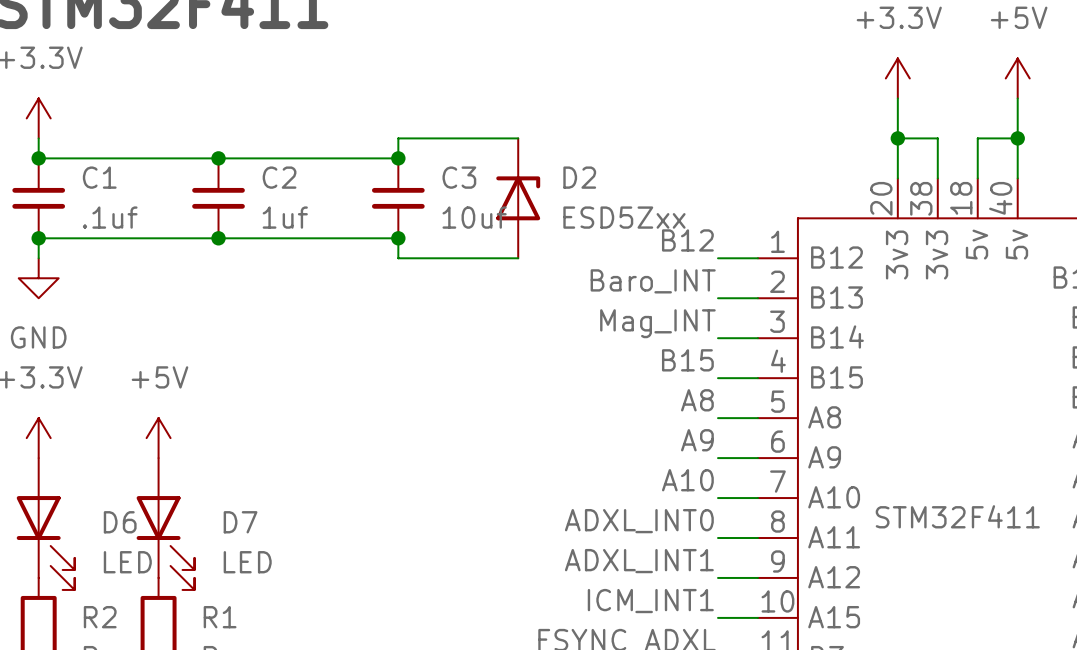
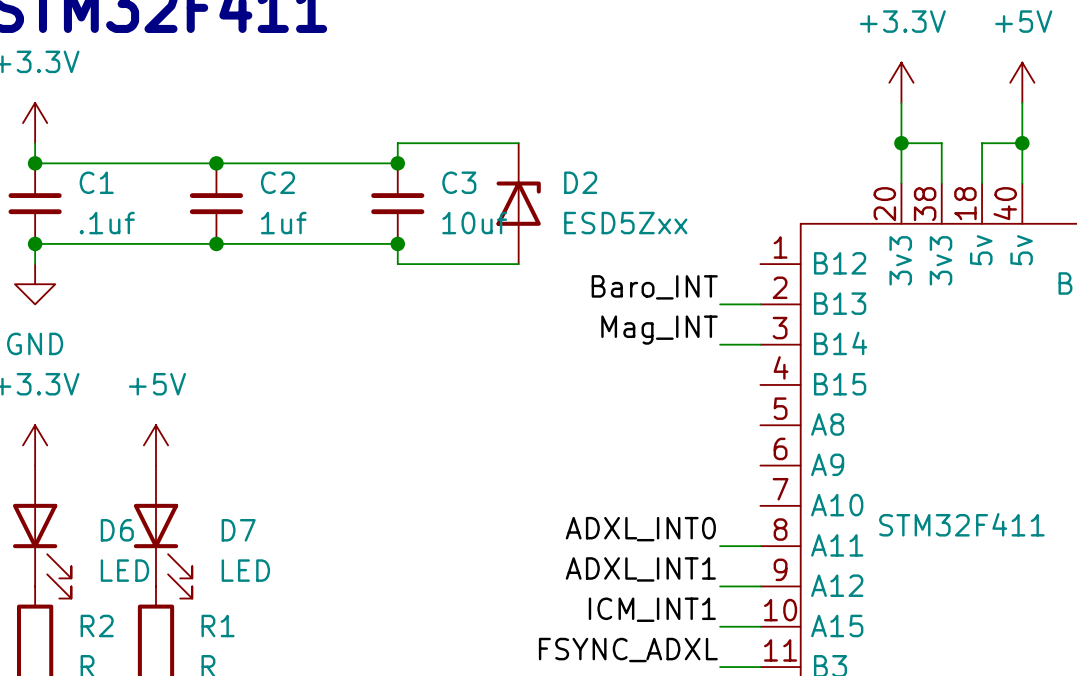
label: B12 (687, 240) -> none
wire: (718, 258) (757, 258) -> none
label: B15 (687, 360) -> none
wire: (718, 378) (757, 378) -> none
label: A8 (697, 400) -> none
wire: (718, 418) (757, 418) -> none
label: A9 (697, 440) -> none
wire: (718, 458) (757, 458) -> none
label: A10 (687, 480) -> none
wire: (718, 498) (757, 498) -> none

